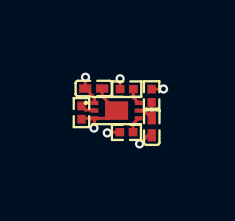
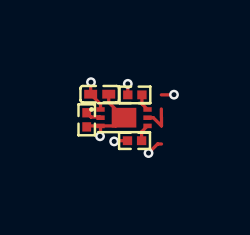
part: (151, 95) -> none
part: (151, 126) -> none

